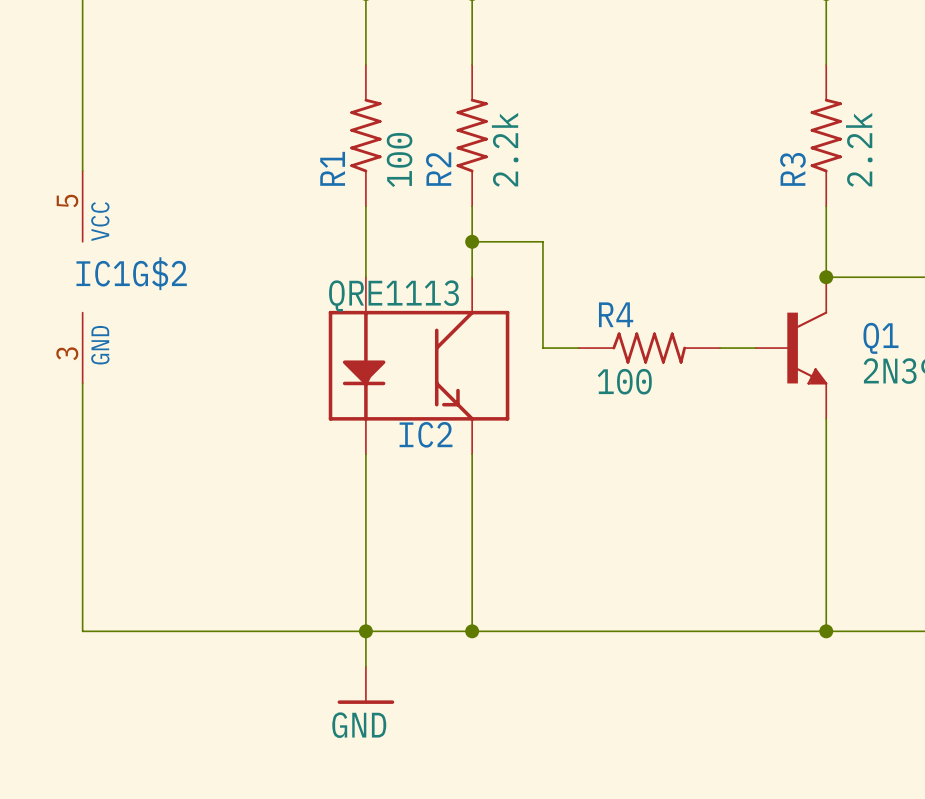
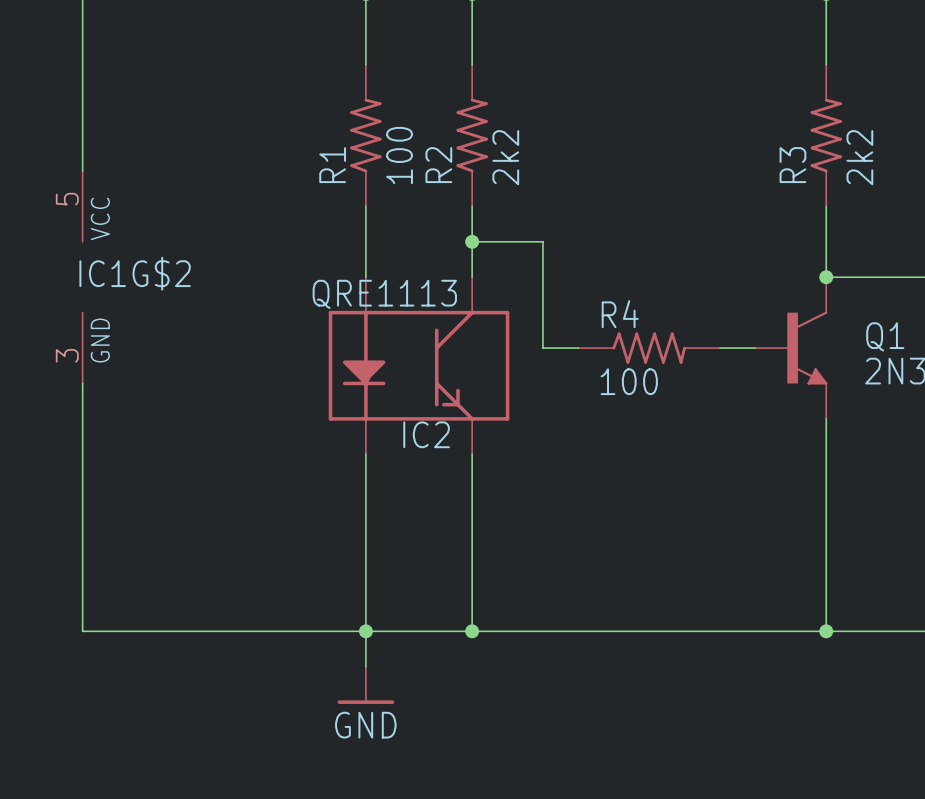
R2 value: 2.2k (505, 149) -> 2k2 (505, 157)
R3 value: 2.2k (859, 149) -> 2k2 (859, 157)

